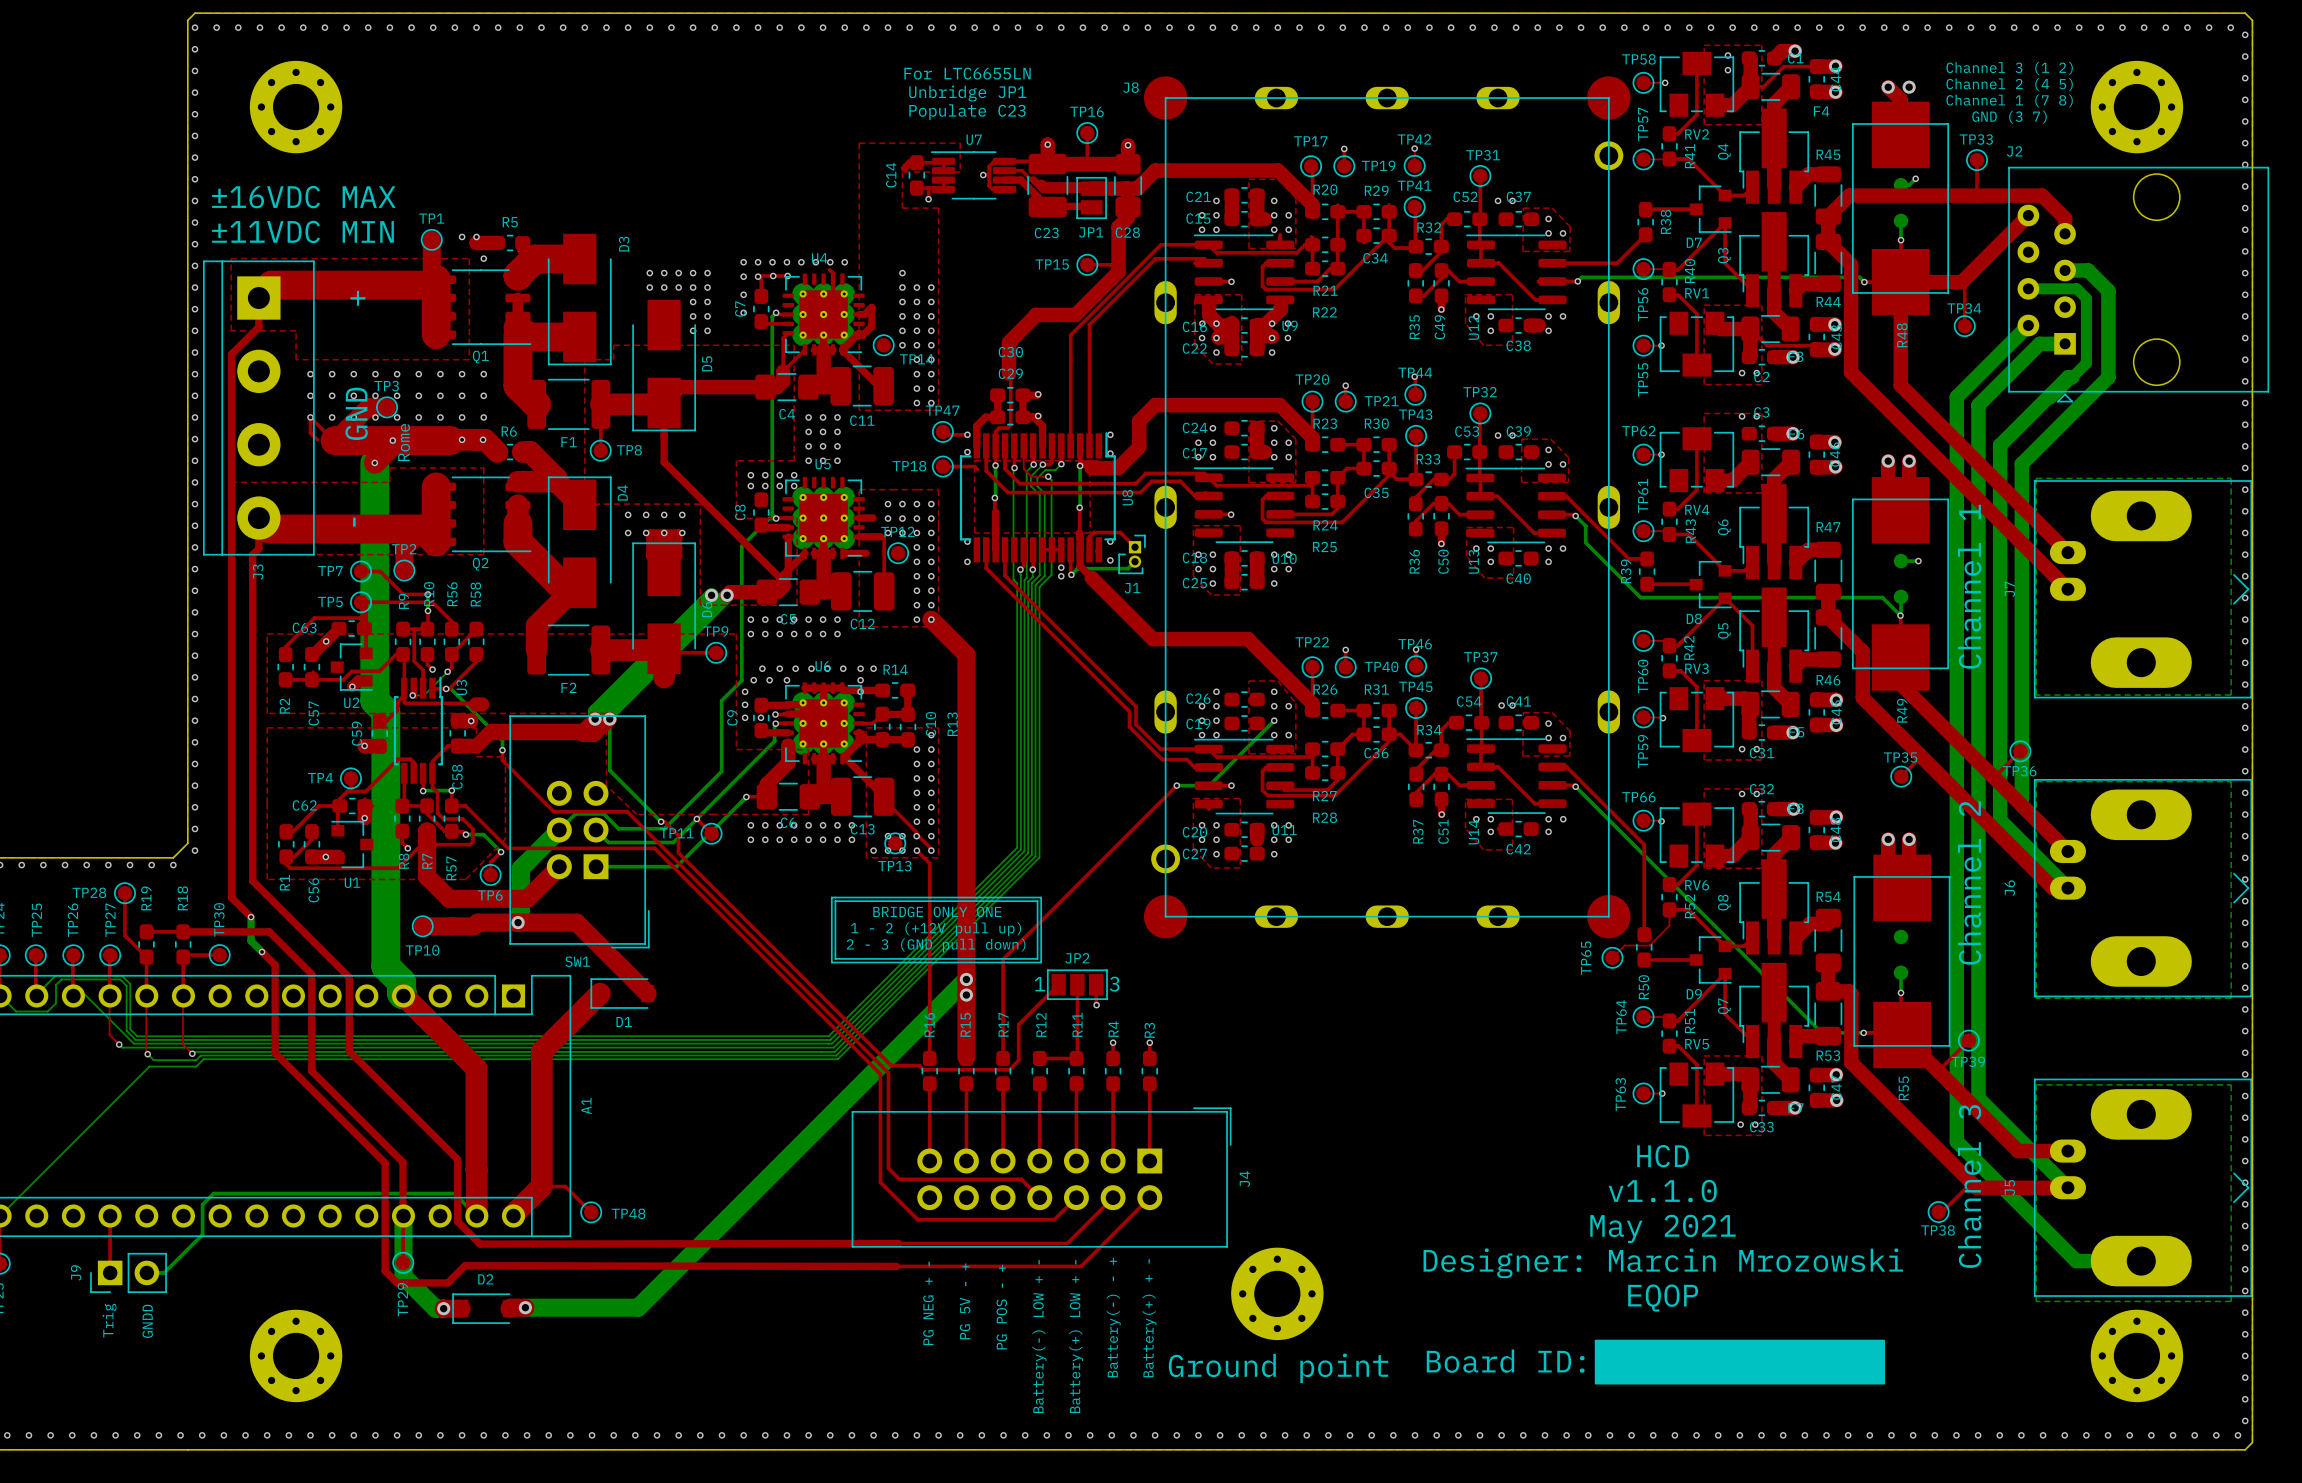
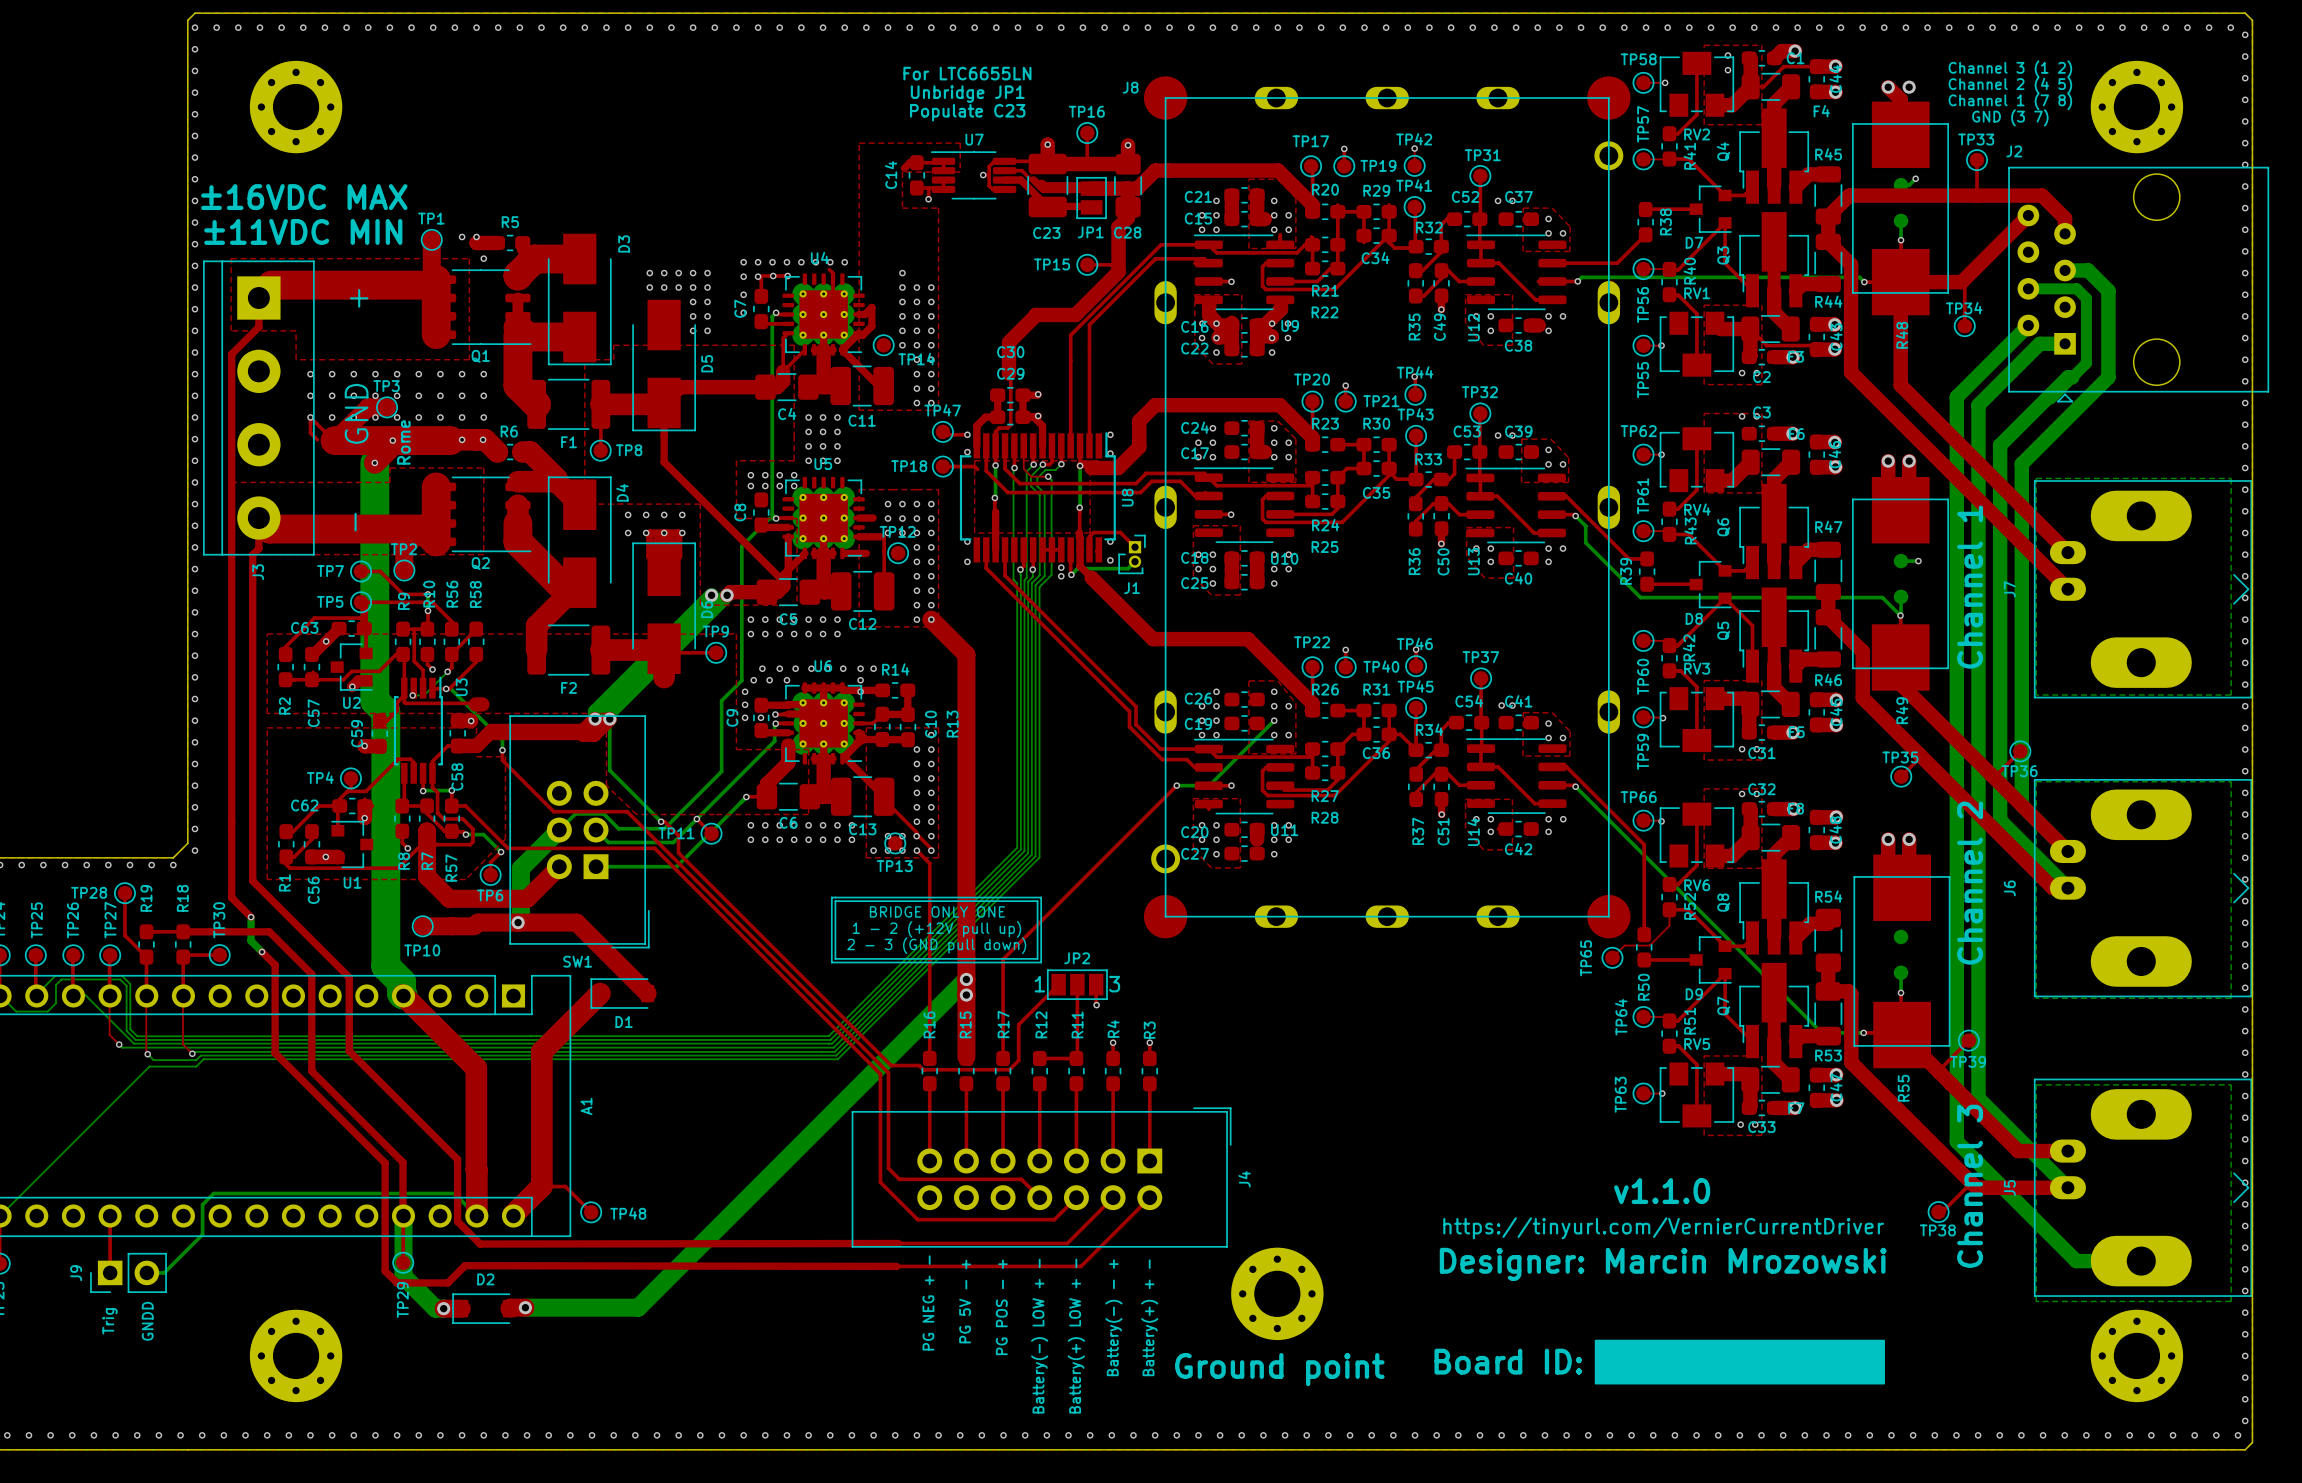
text: HCD (1663, 1156) -> none
text: May 2021 (1662, 1228) -> https://tinyurl.com/VernierCurrentDriver (1663, 1228)
text: EQOP (1663, 1298) -> none

